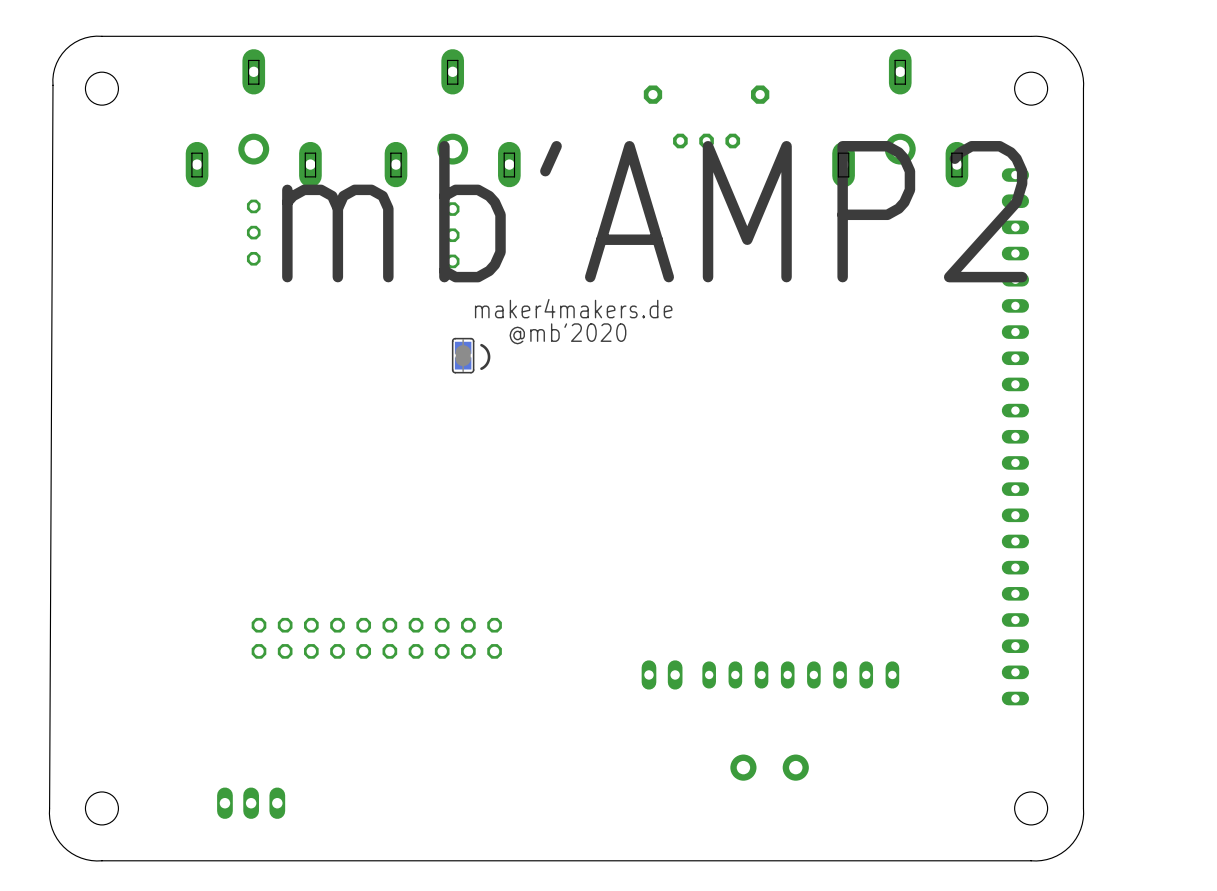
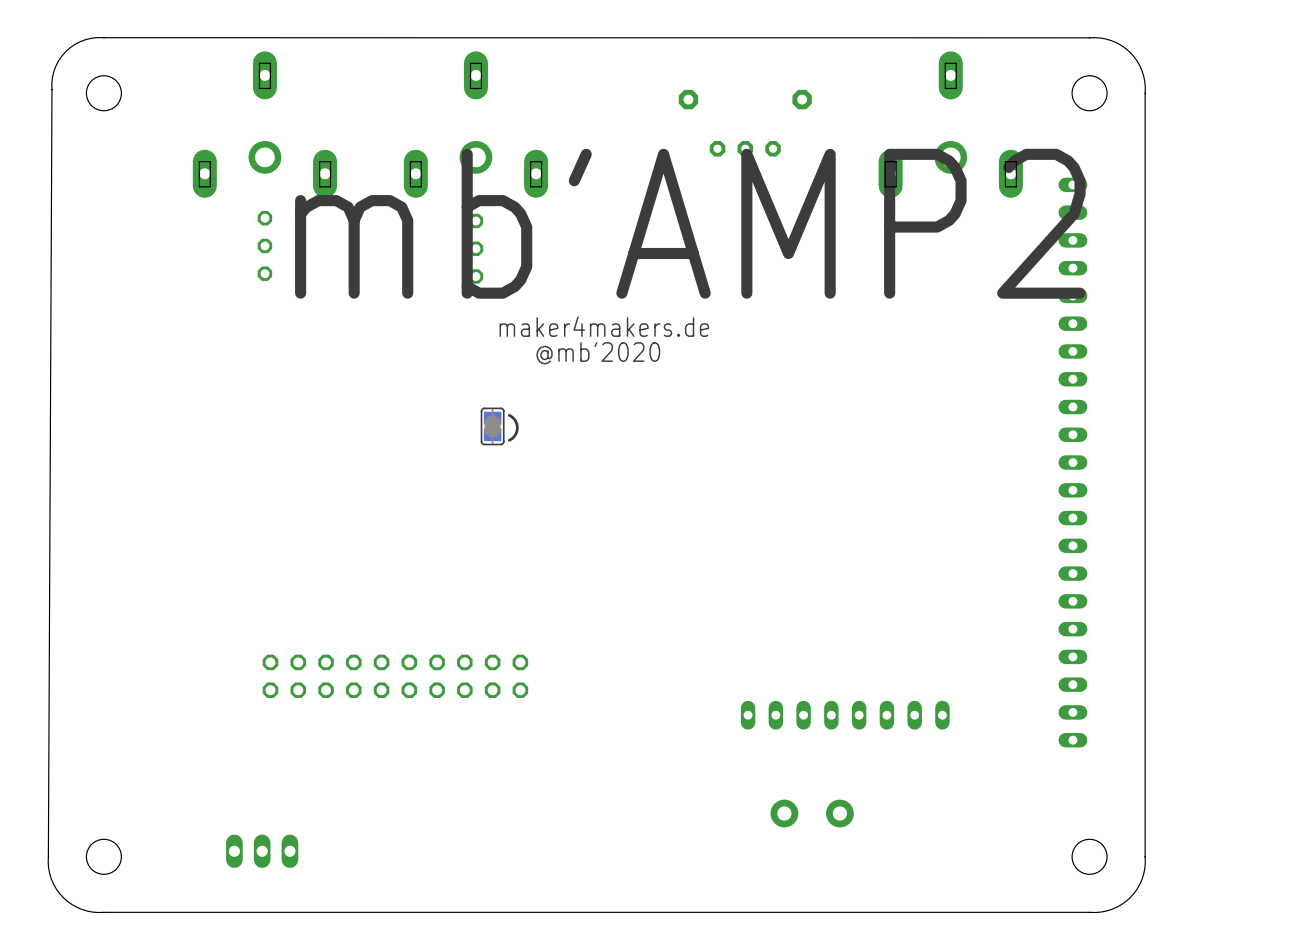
line: (481, 345) (486, 349) (489, 356) (486, 364) (481, 368) -> (509, 415) (514, 419) (517, 427) (514, 435) (509, 440)
part position: (463, 355) -> (492, 426)
part: (662, 674) -> none

